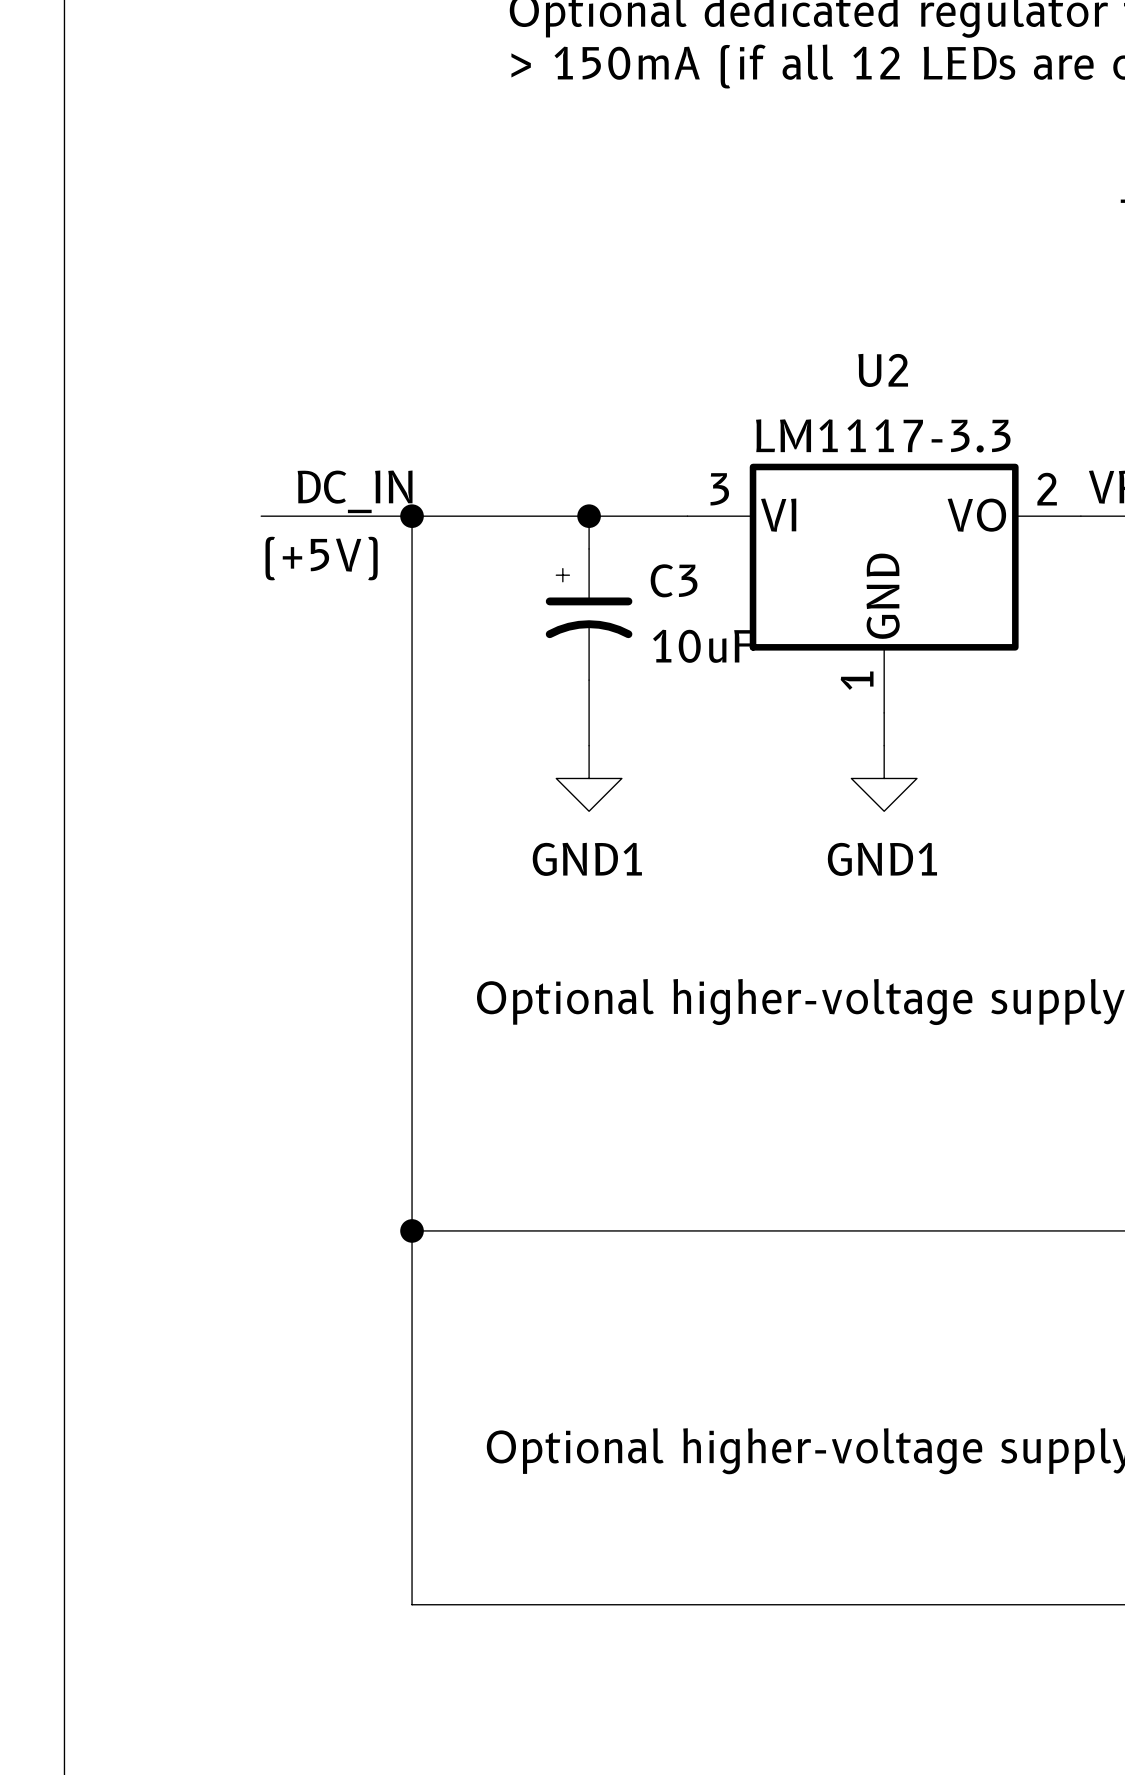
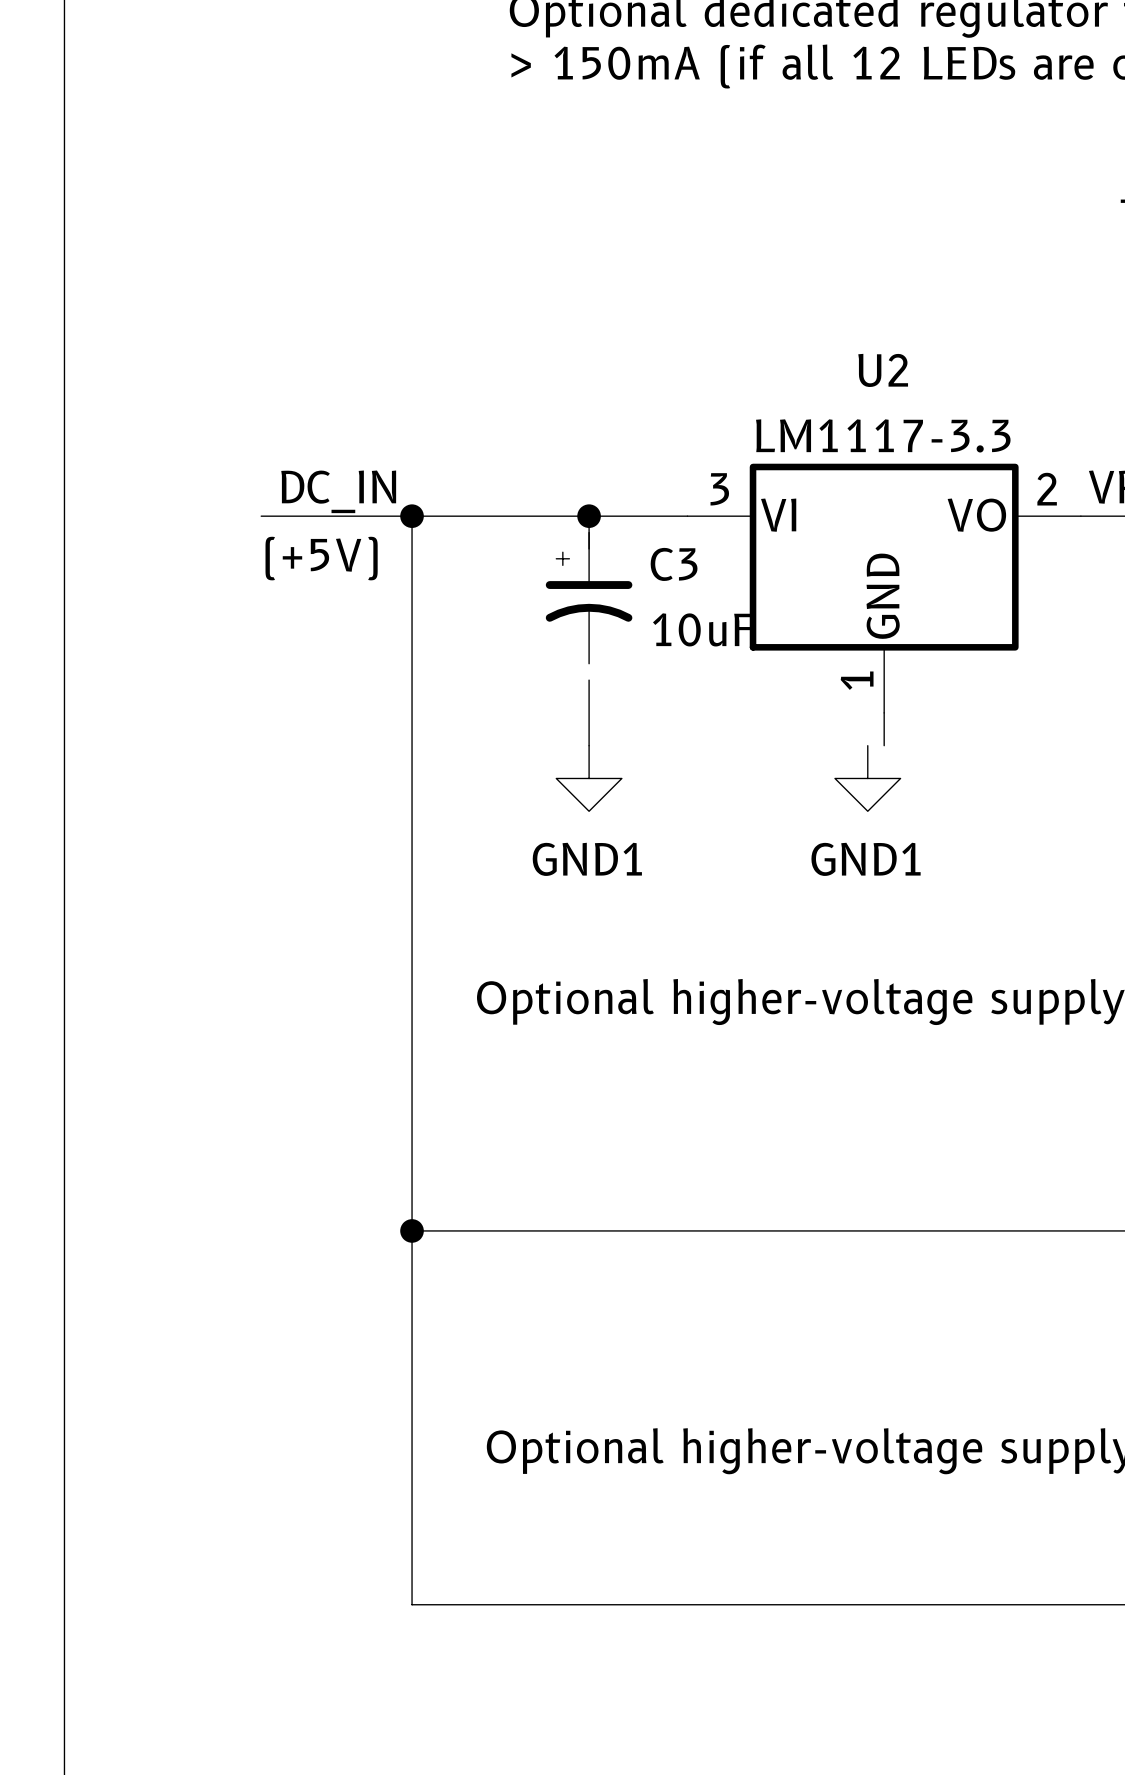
label position: DC_IN (355, 491) -> DC_IN (338, 491)
C3 position: (589, 614) -> (589, 598)
power symbol position: GND1 (884, 778) -> GND1 (867, 778)

